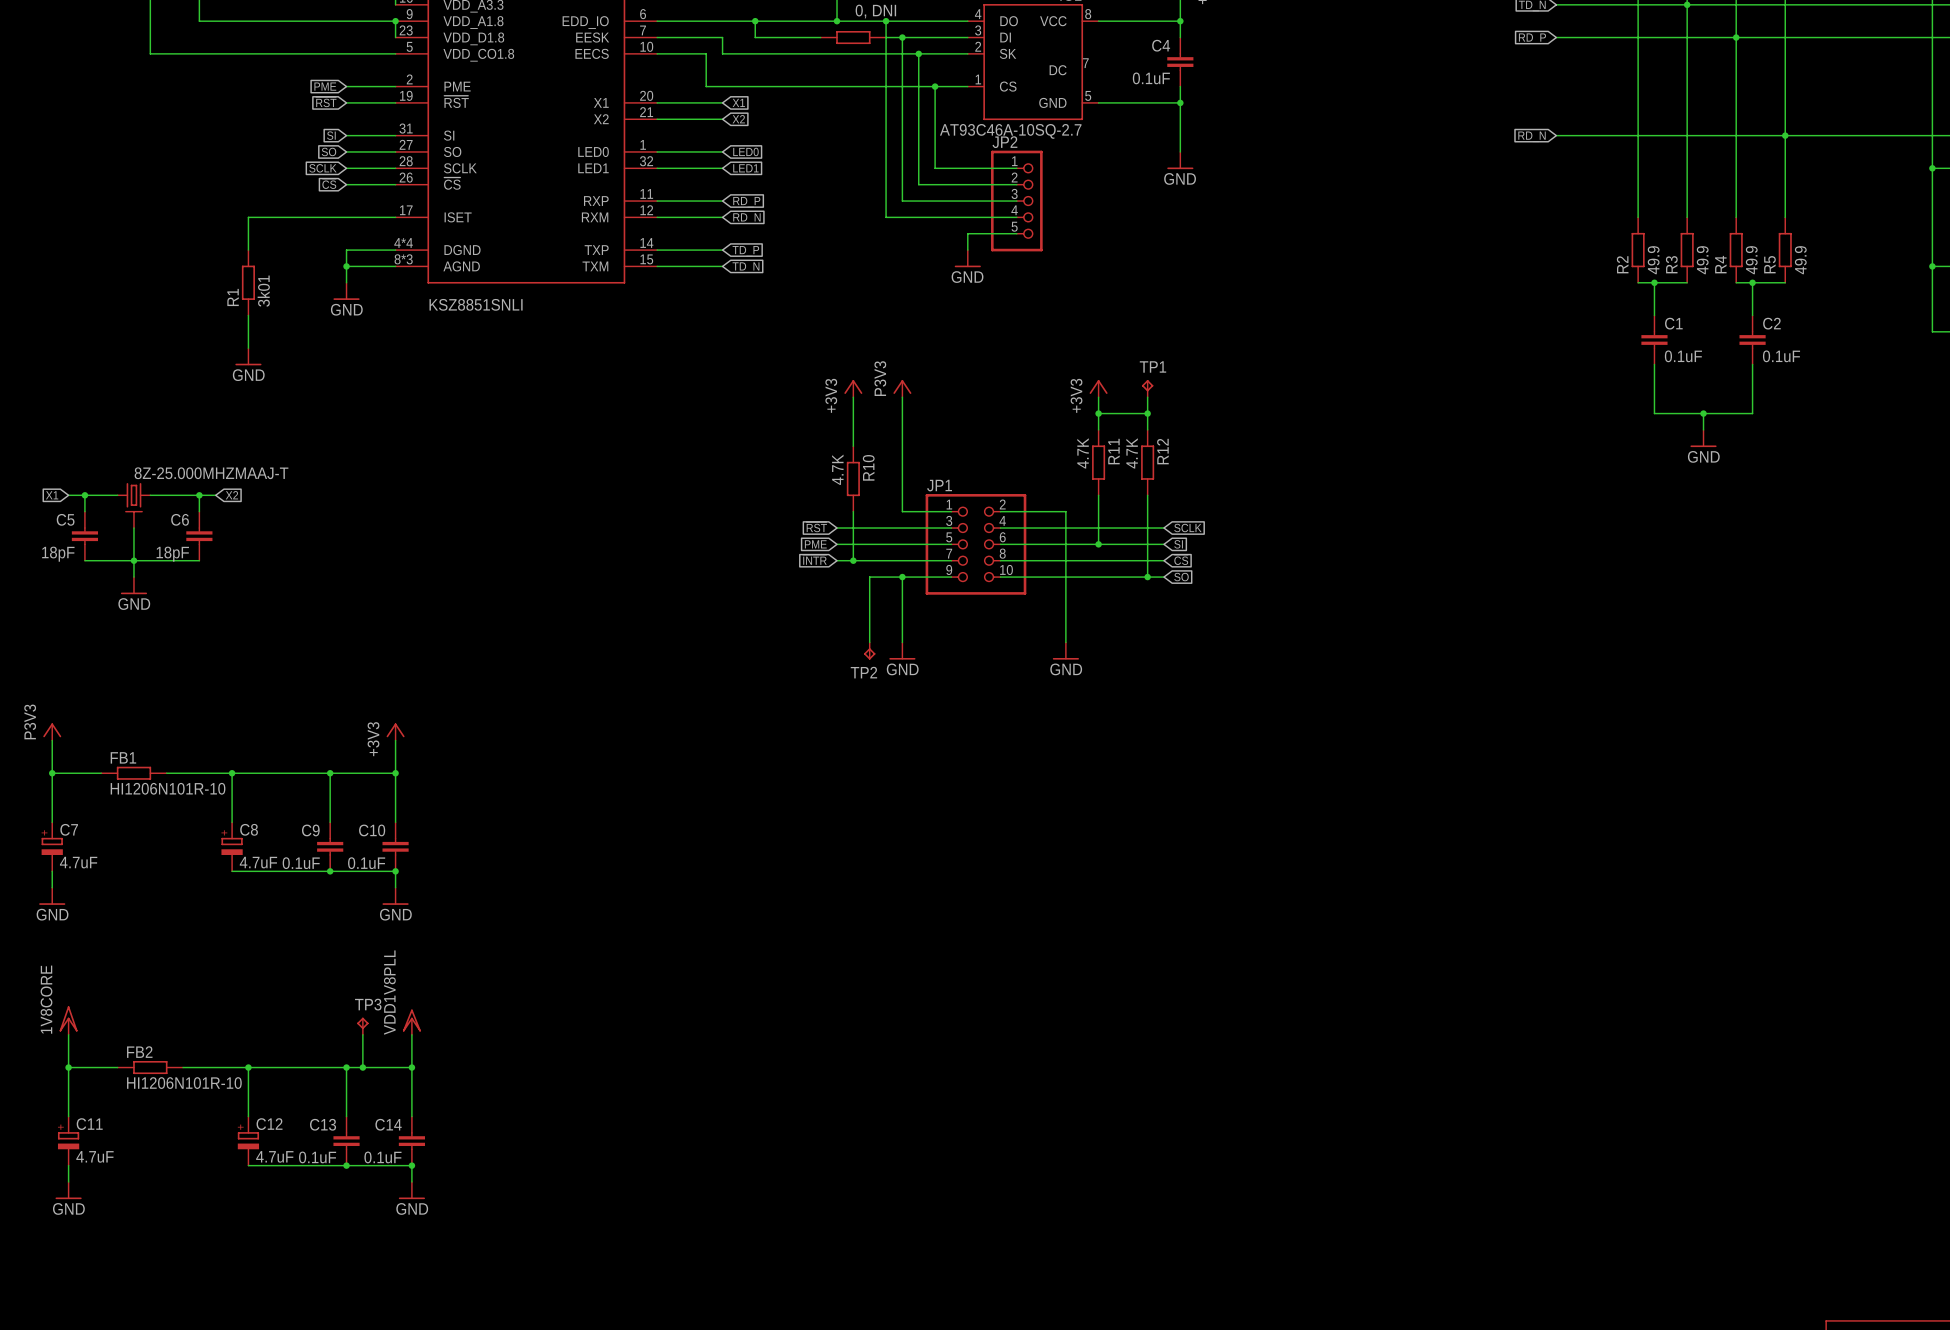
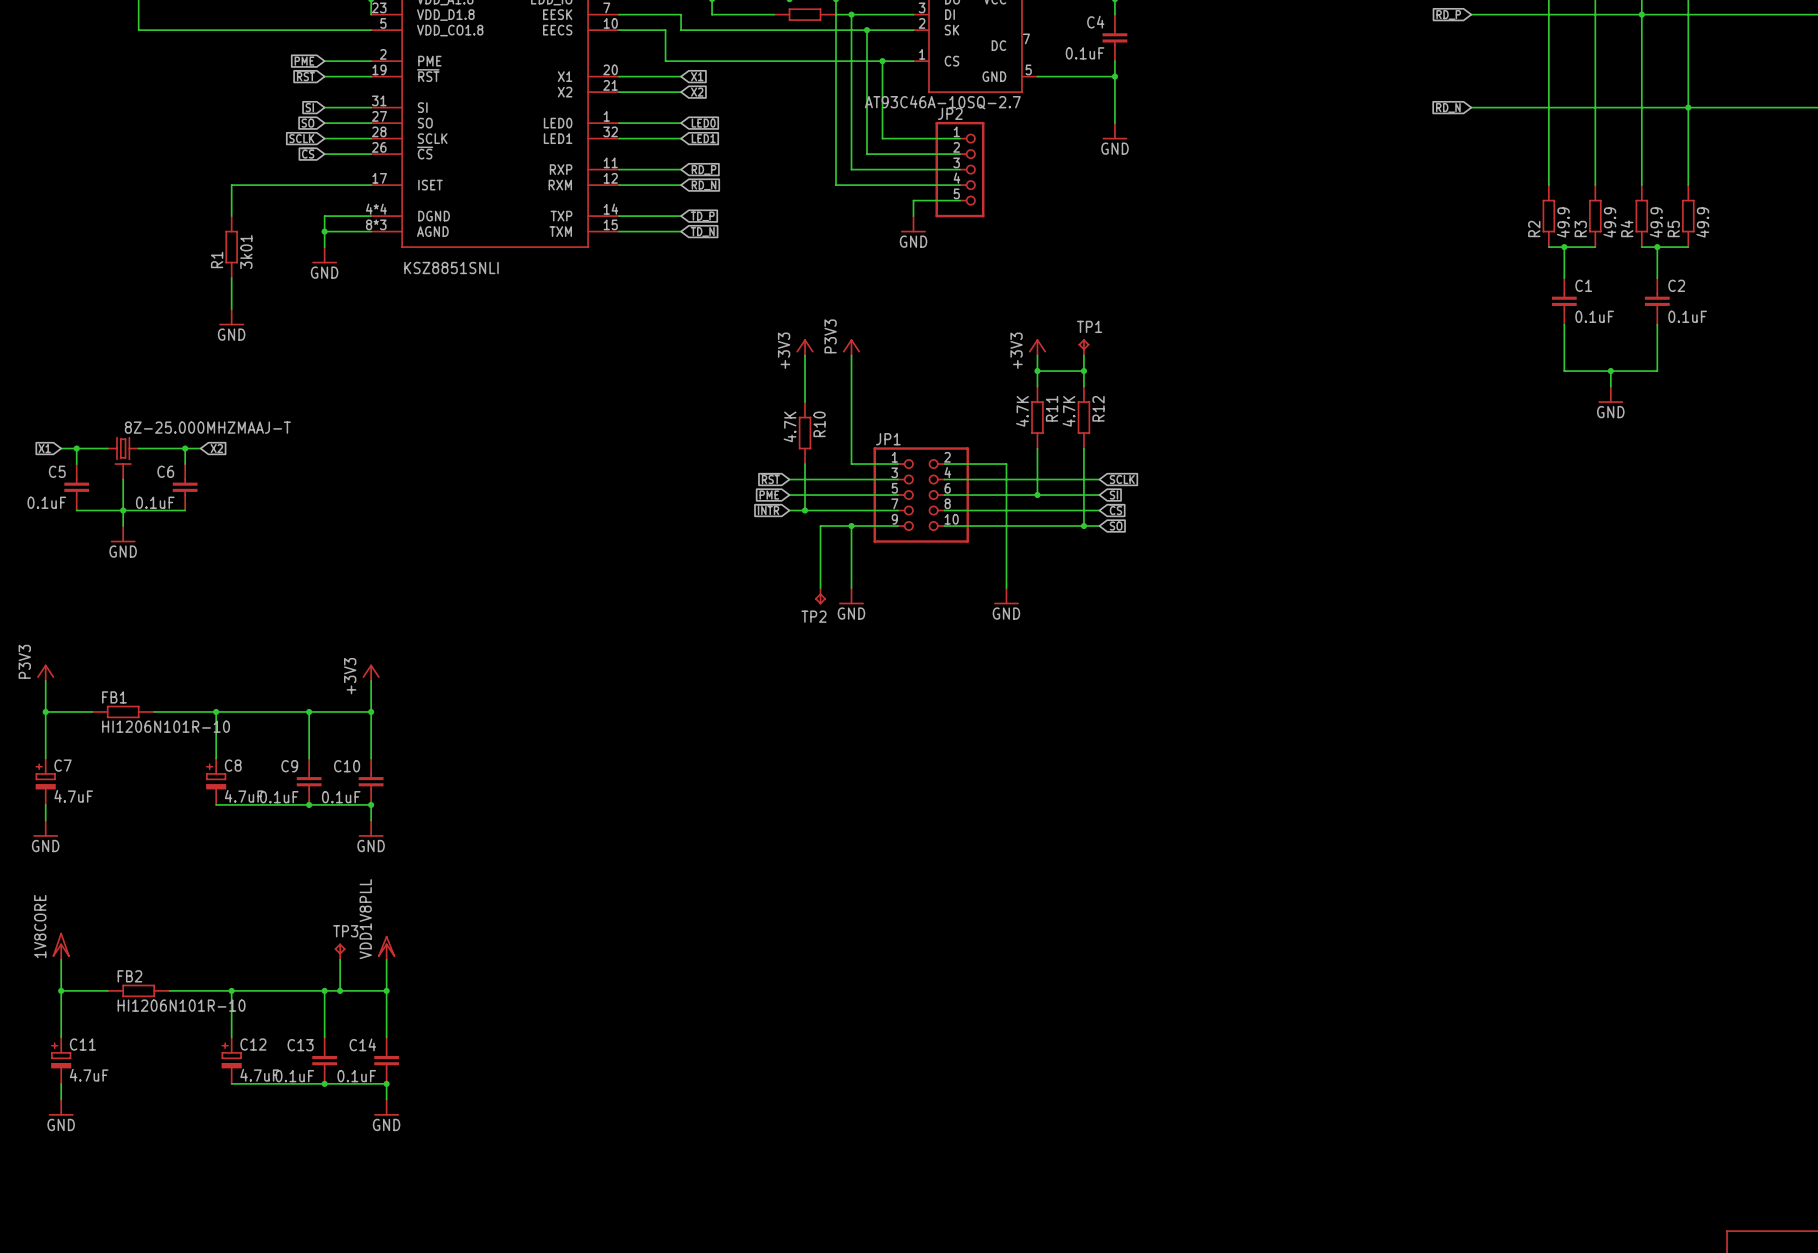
C5 value: 18pF (58, 554) -> 0.1uF (46, 502)
C6 value: 18pF (172, 554) -> 0.1uF (155, 502)

